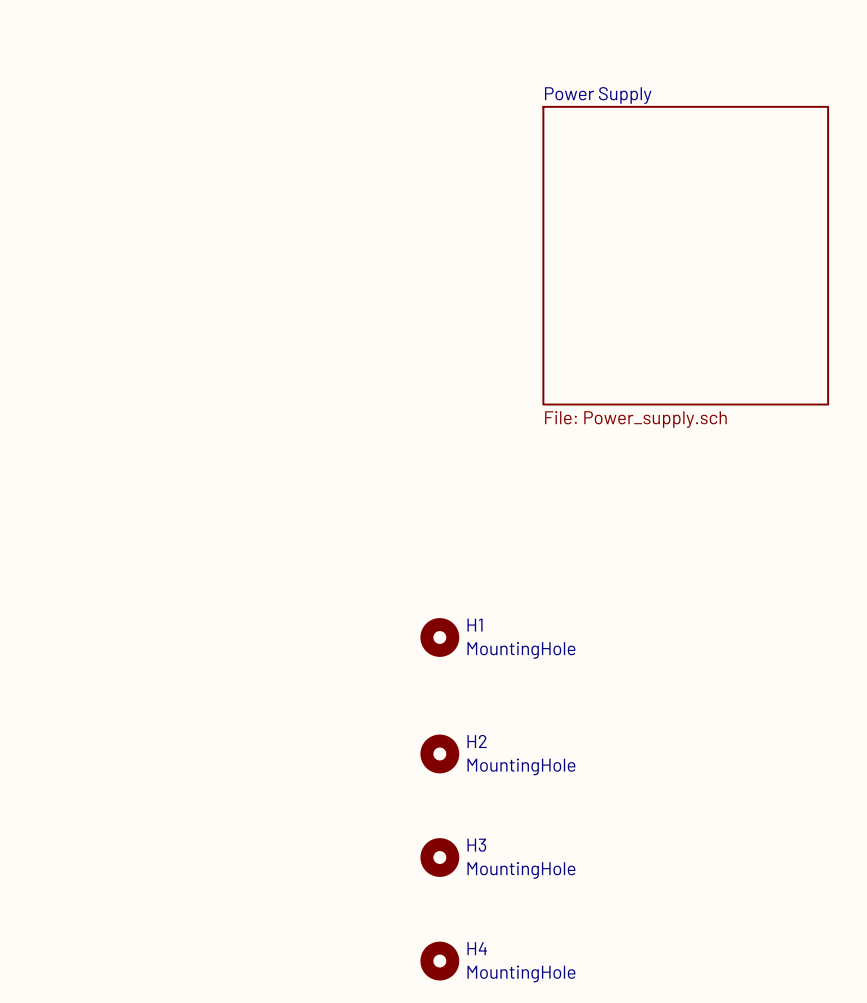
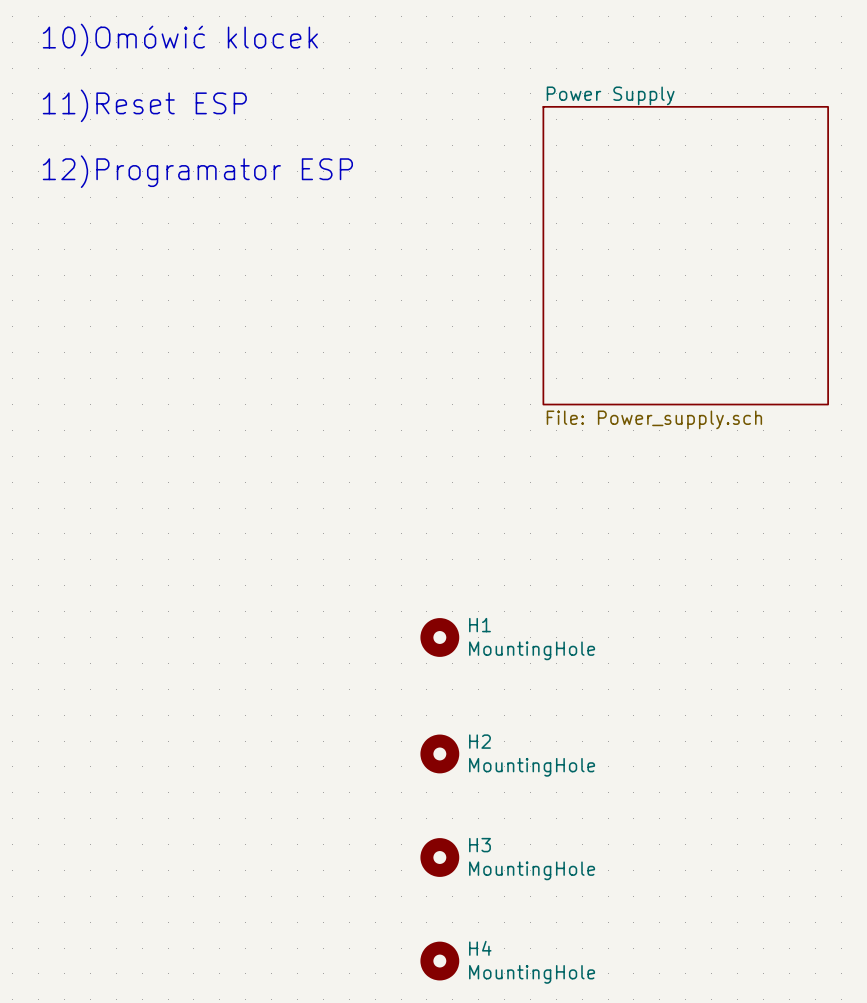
text: none -> 10)Omówić klocek (180, 39)
text: none -> 11)Reset ESP (144, 105)
text: none -> 12)Programator ESP (197, 171)

